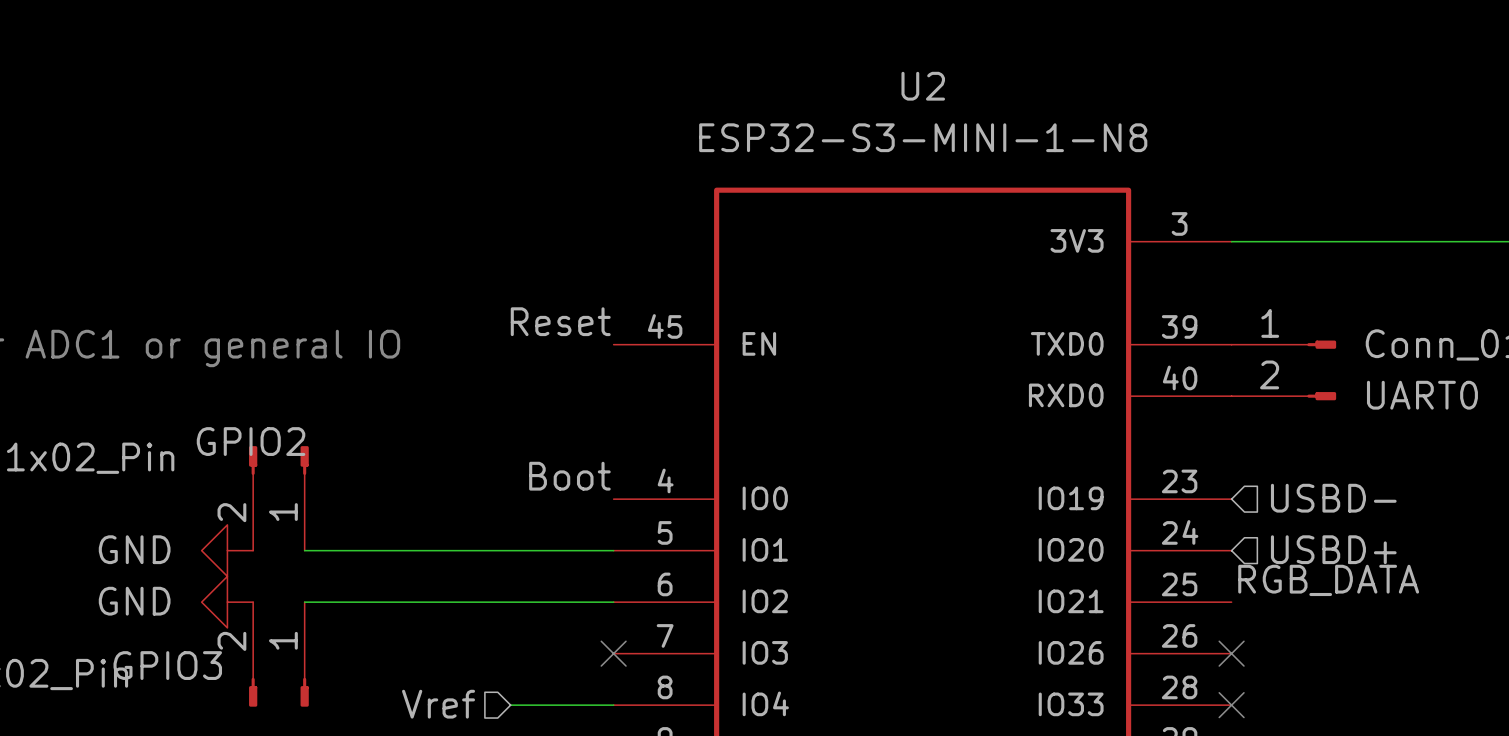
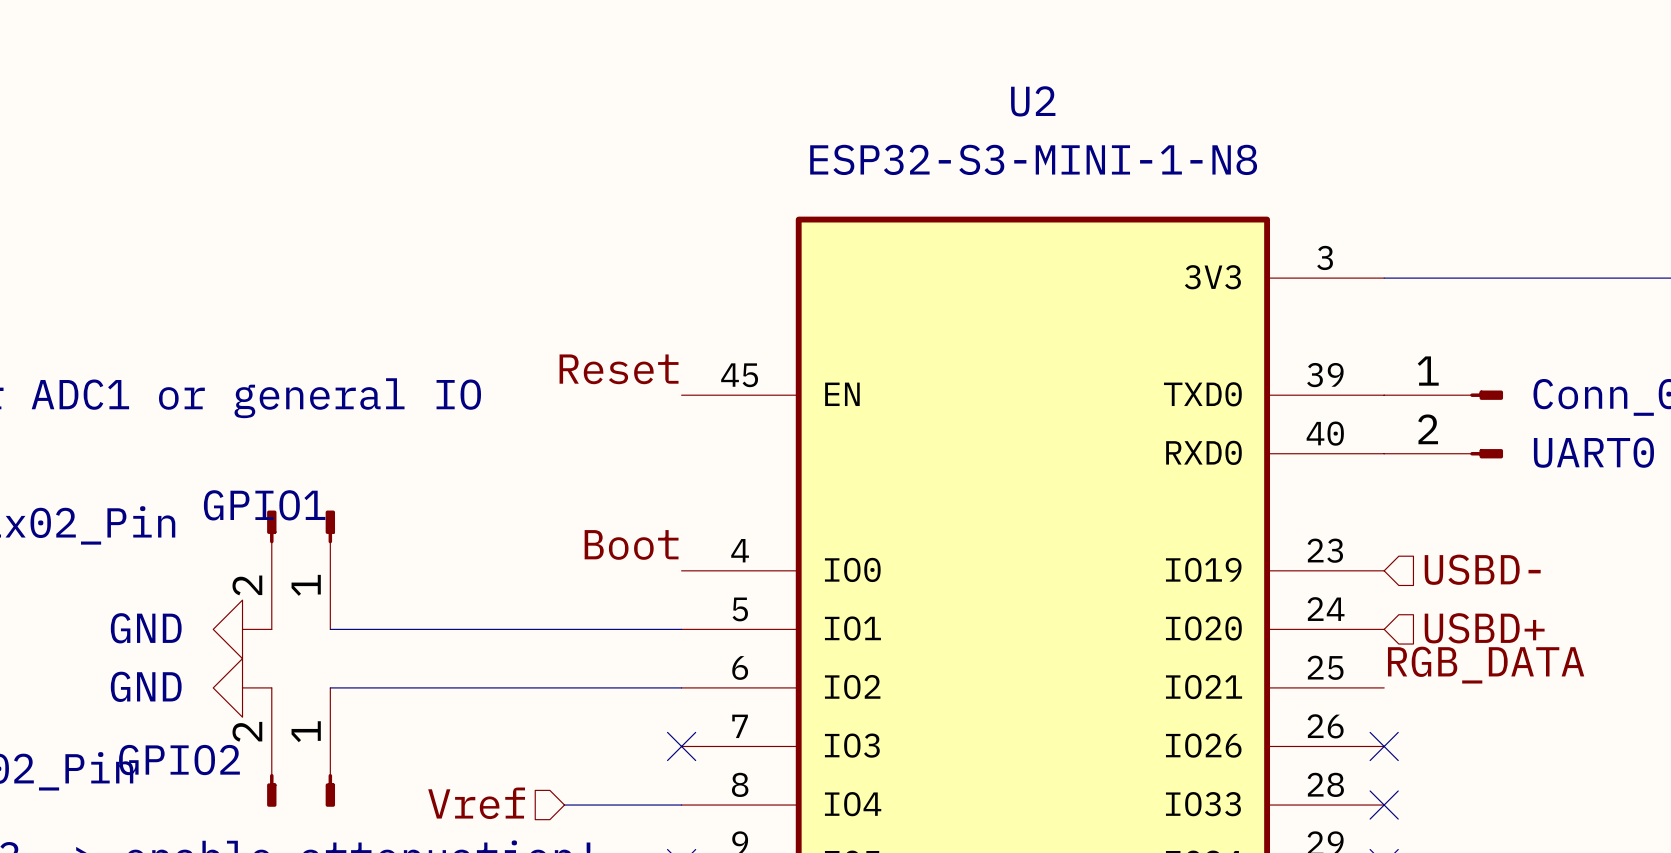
GPIO2 name: GPIO2 (251, 441) -> GPIO1 (264, 505)
GPIO3 name: GPIO3 (167, 665) -> GPIO2 (179, 760)

